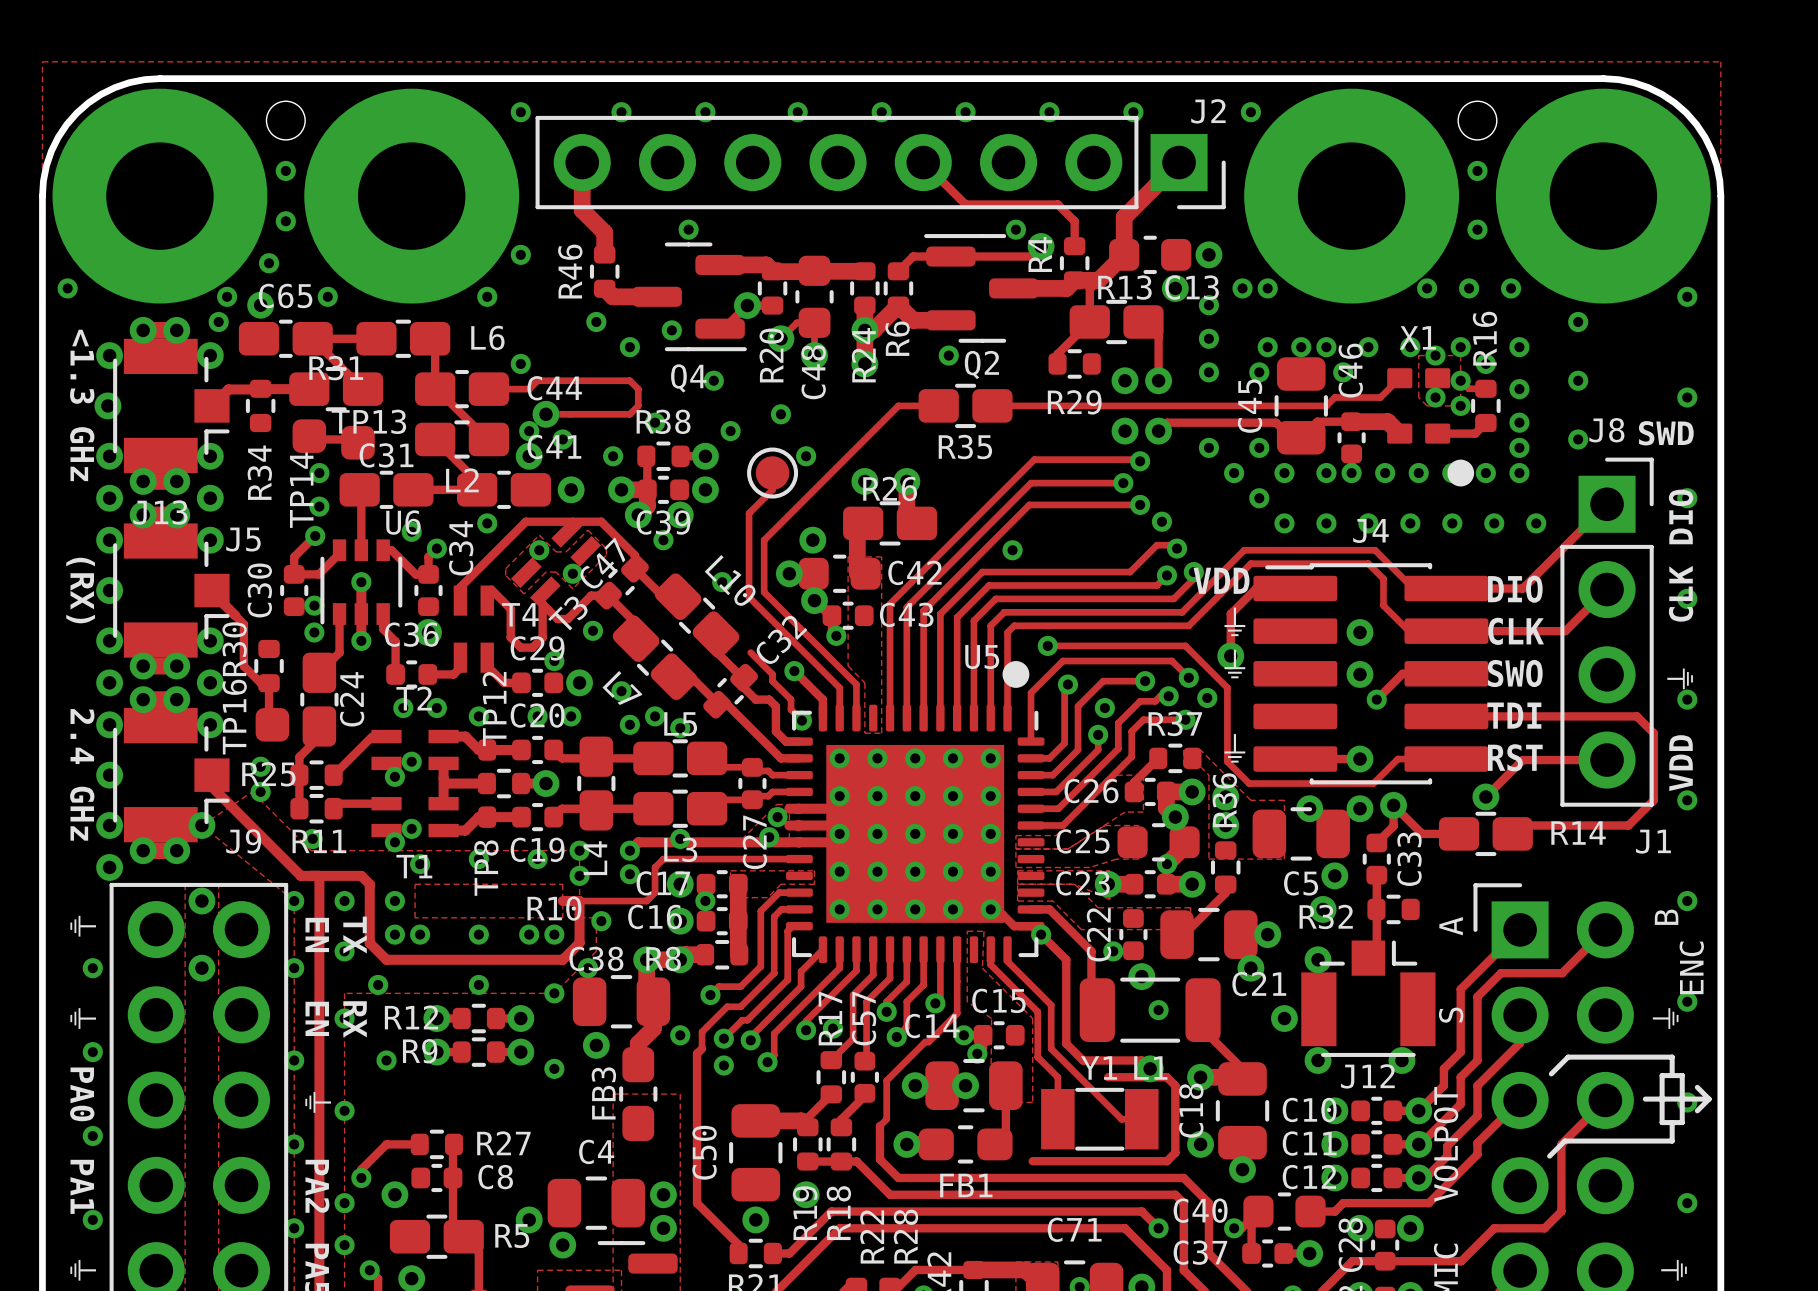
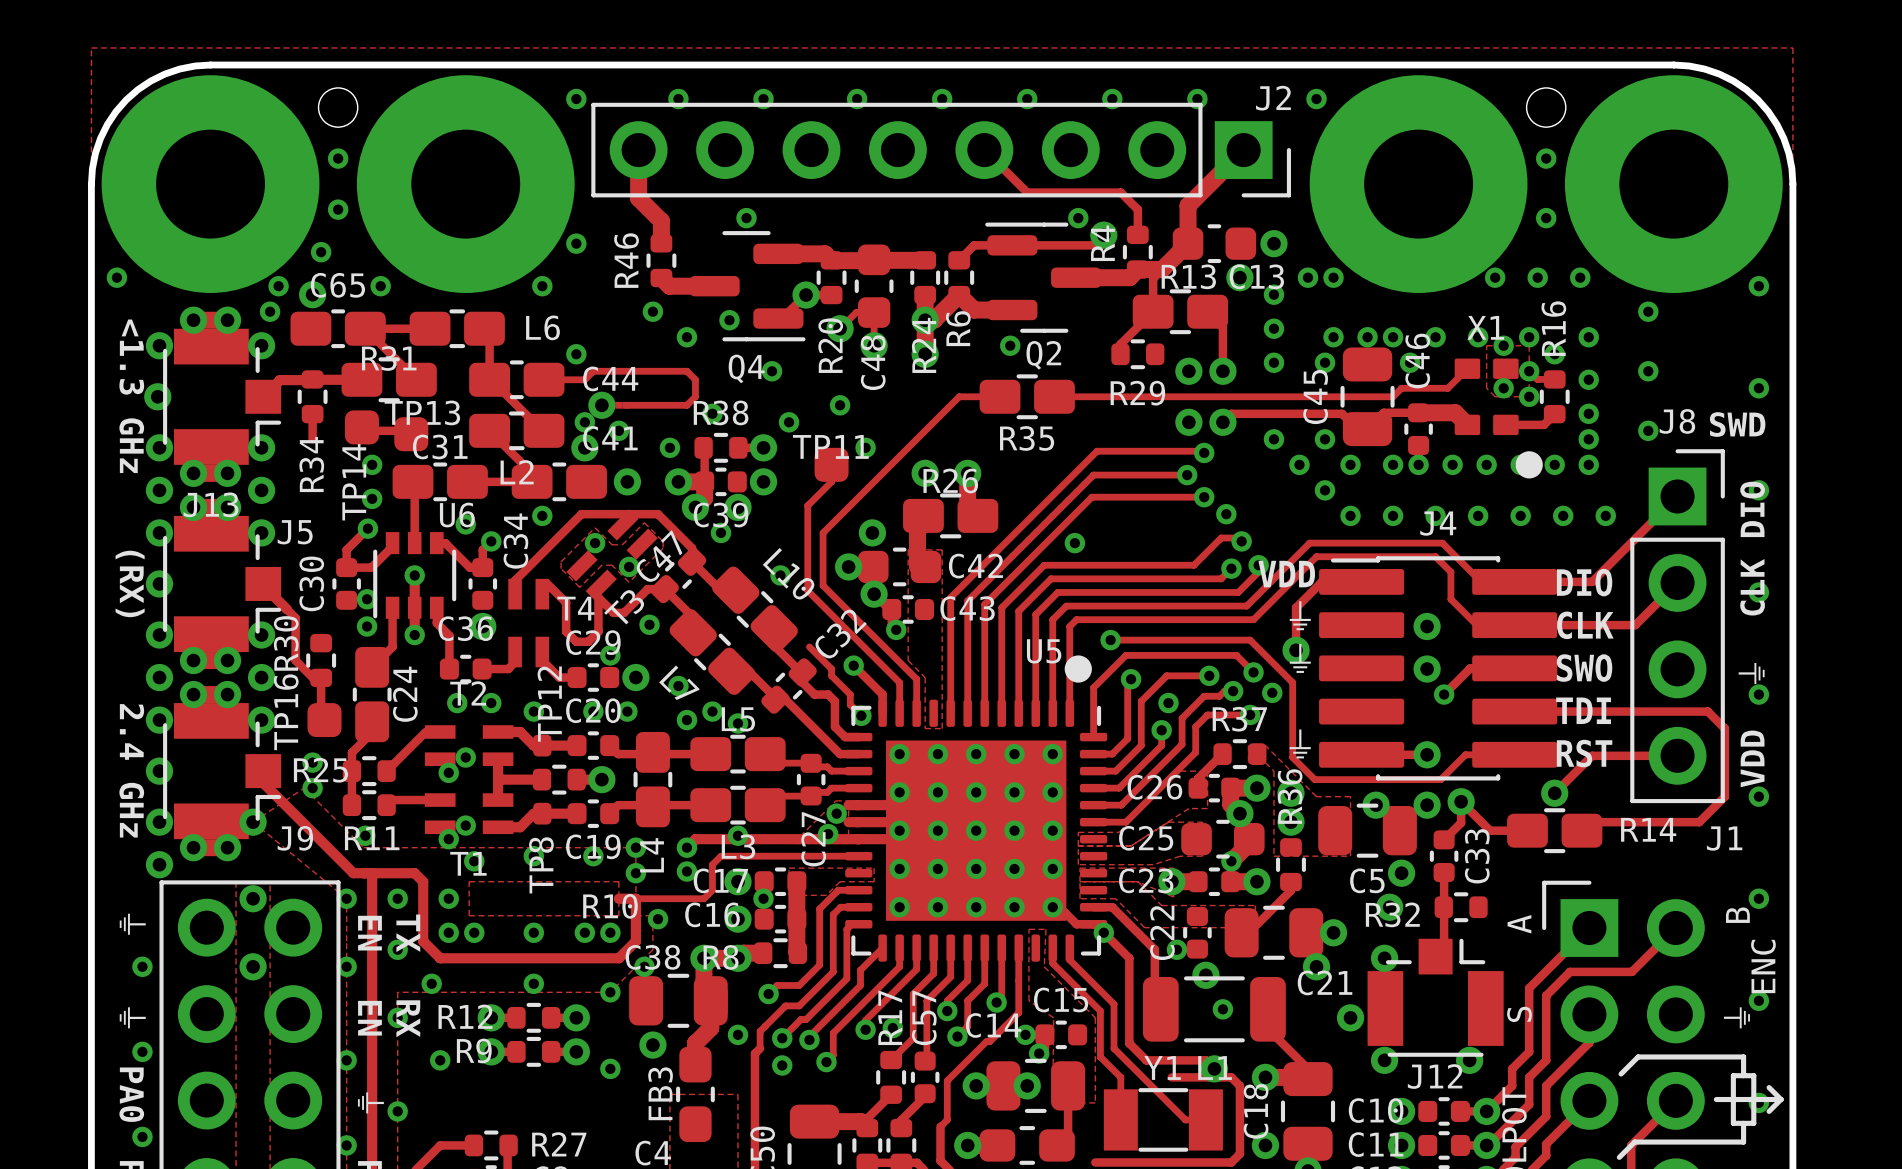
track: none -> (312, 414) (312, 439)
part: (772, 473) -> none
TP11: none -> (831, 464)

